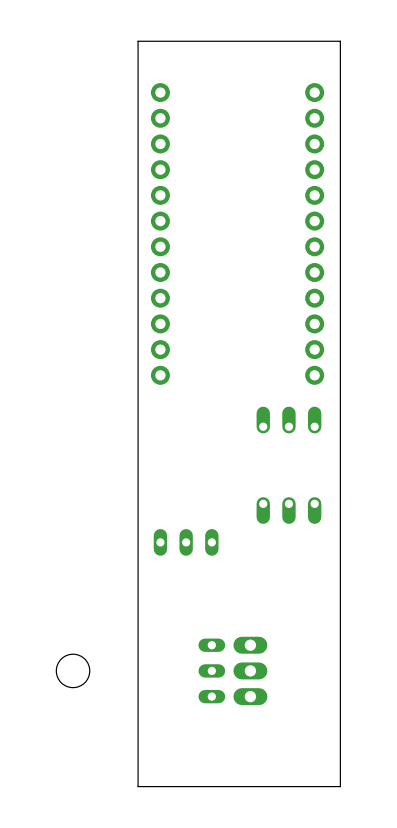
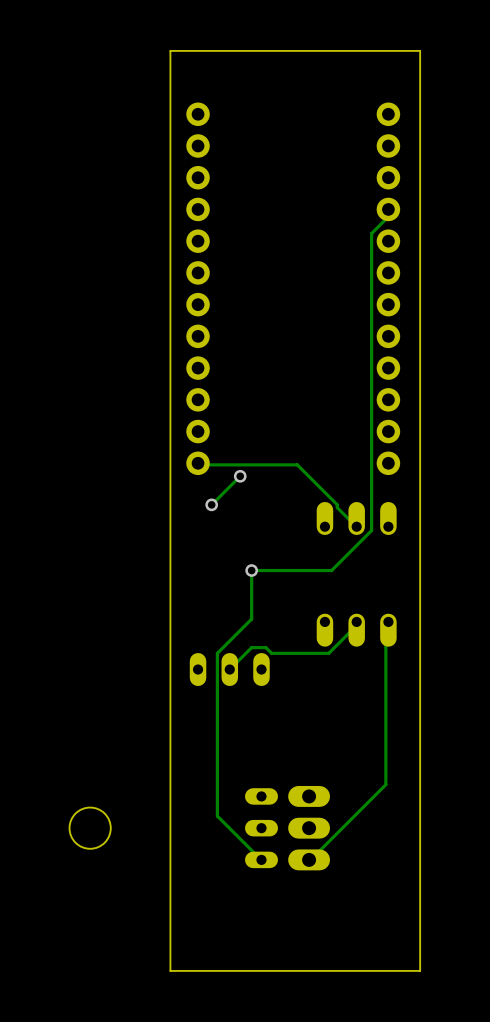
track: none -> (388, 209) (385, 210) (385, 219) (371, 233) (371, 530) (331, 570) (251, 570) (251, 619) (217, 653) (217, 816) (261, 859)
track: none -> (198, 463) (200, 464) (297, 464) (356, 526)
track: none -> (240, 476) (211, 504)
via: none -> (240, 476)
via: none -> (211, 504)
via: none -> (251, 570)
track: none -> (356, 621) (354, 621) (354, 627) (328, 653) (271, 653) (265, 647) (251, 647) (229, 669)
track: none -> (388, 621) (385, 621) (385, 784) (309, 859)

